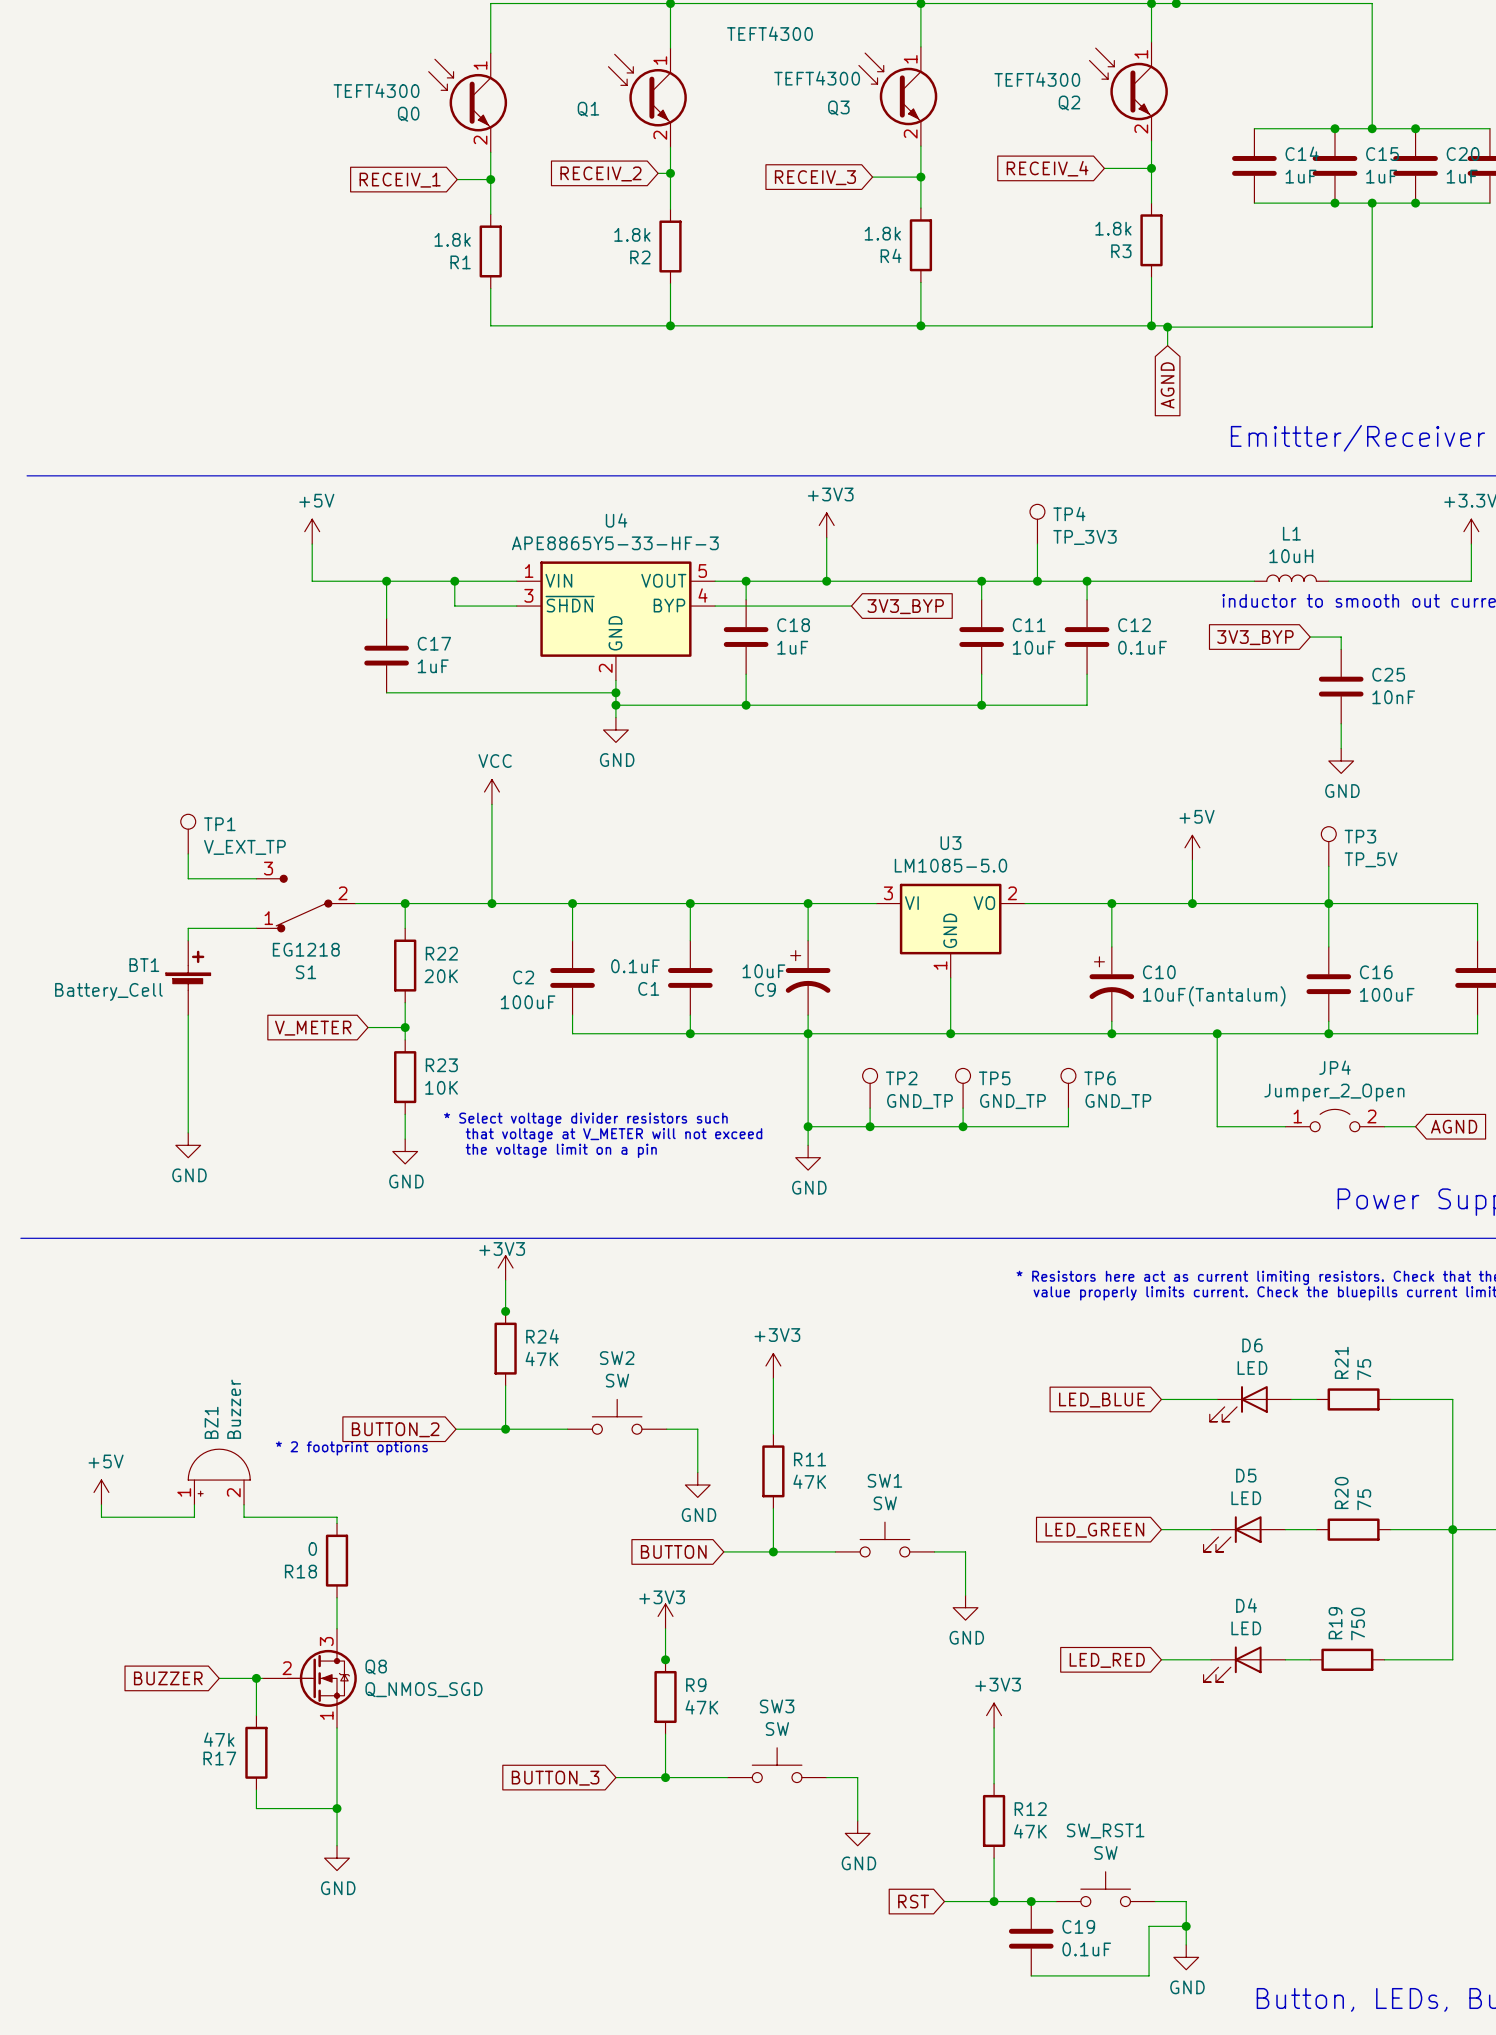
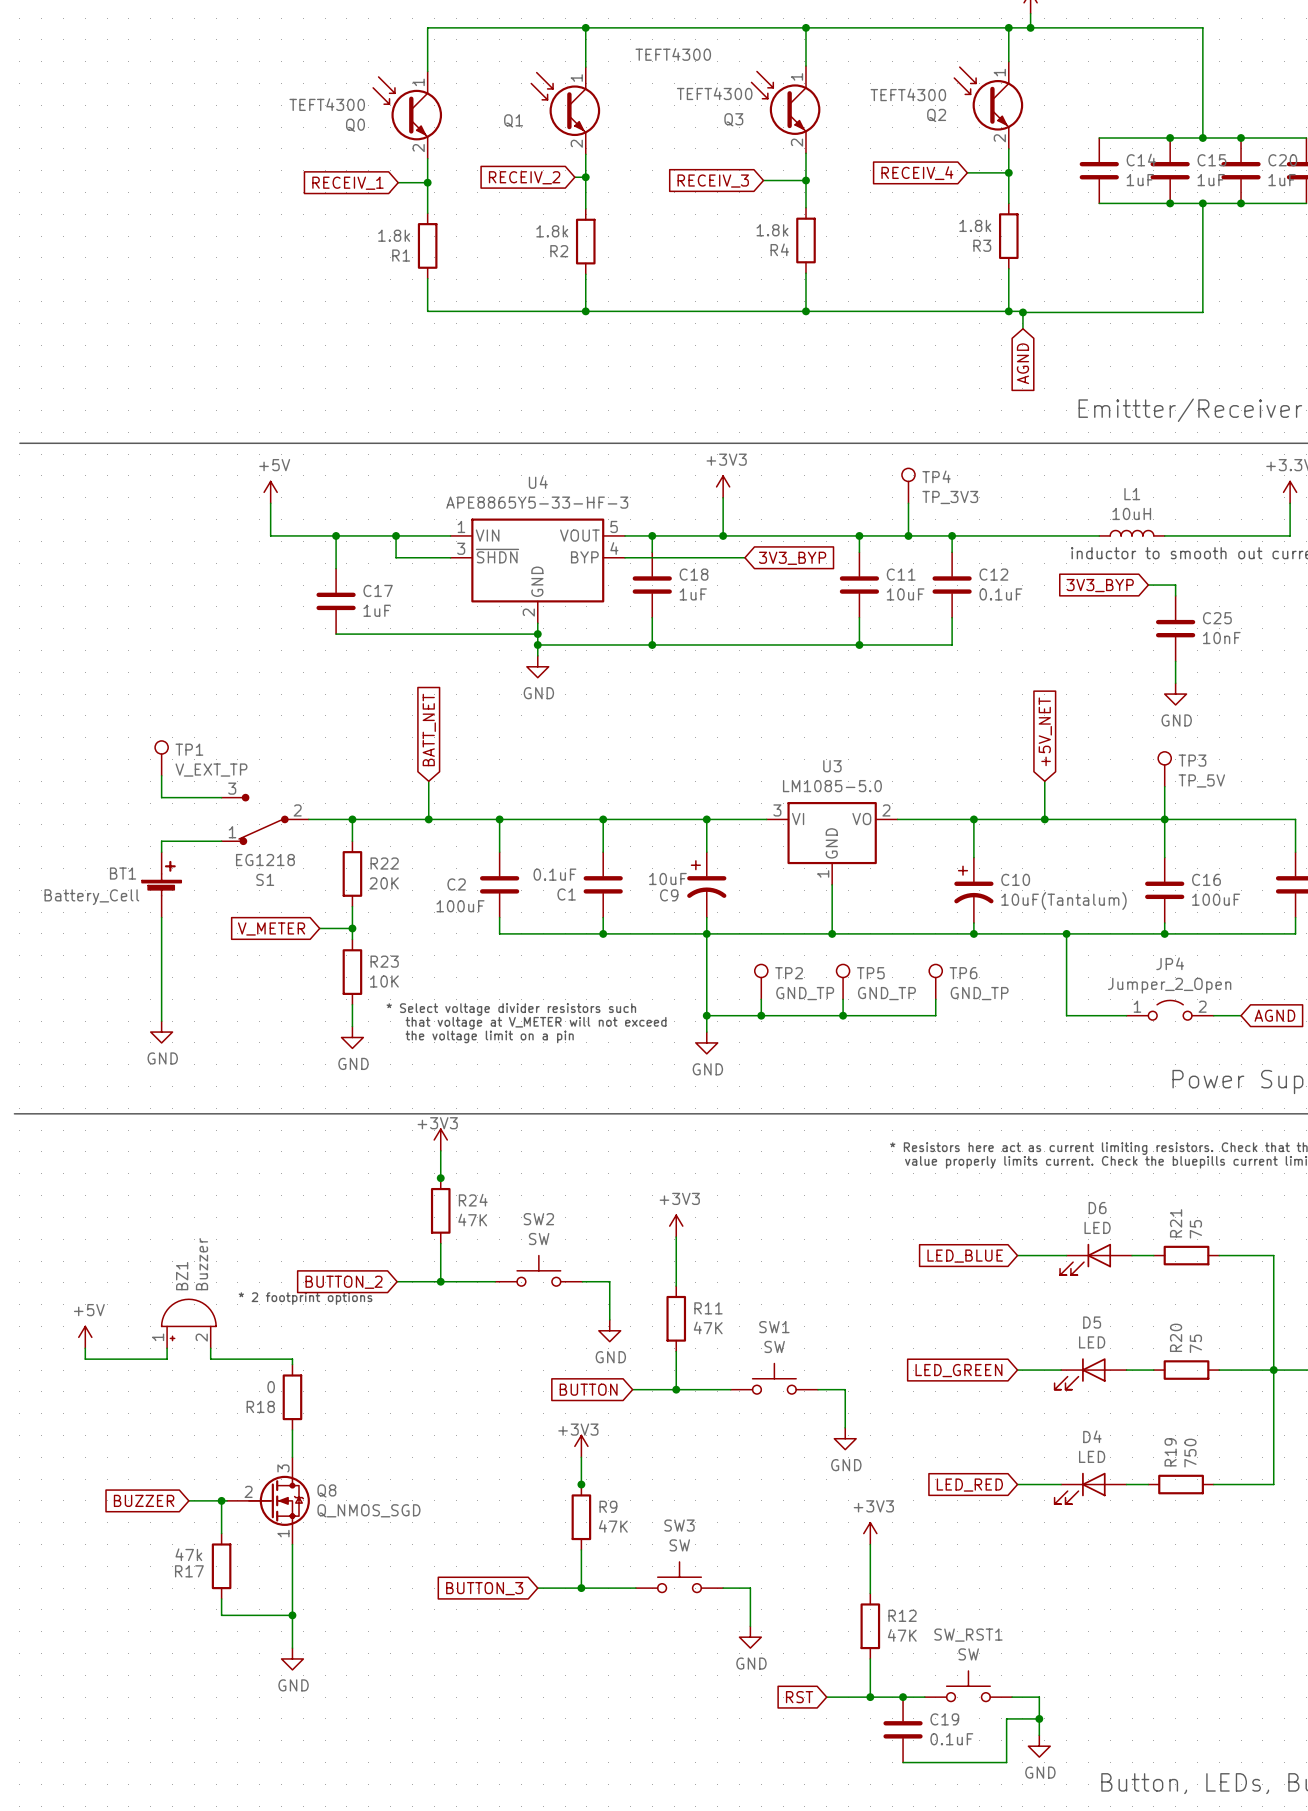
power symbol: VCC (491, 791) -> none
global label: none -> BATT_NET (429, 729)
global label: none -> +5V_NET (1045, 731)
wire: (491, 804) (491, 860) -> none
power symbol: +5V (1192, 847) -> none

